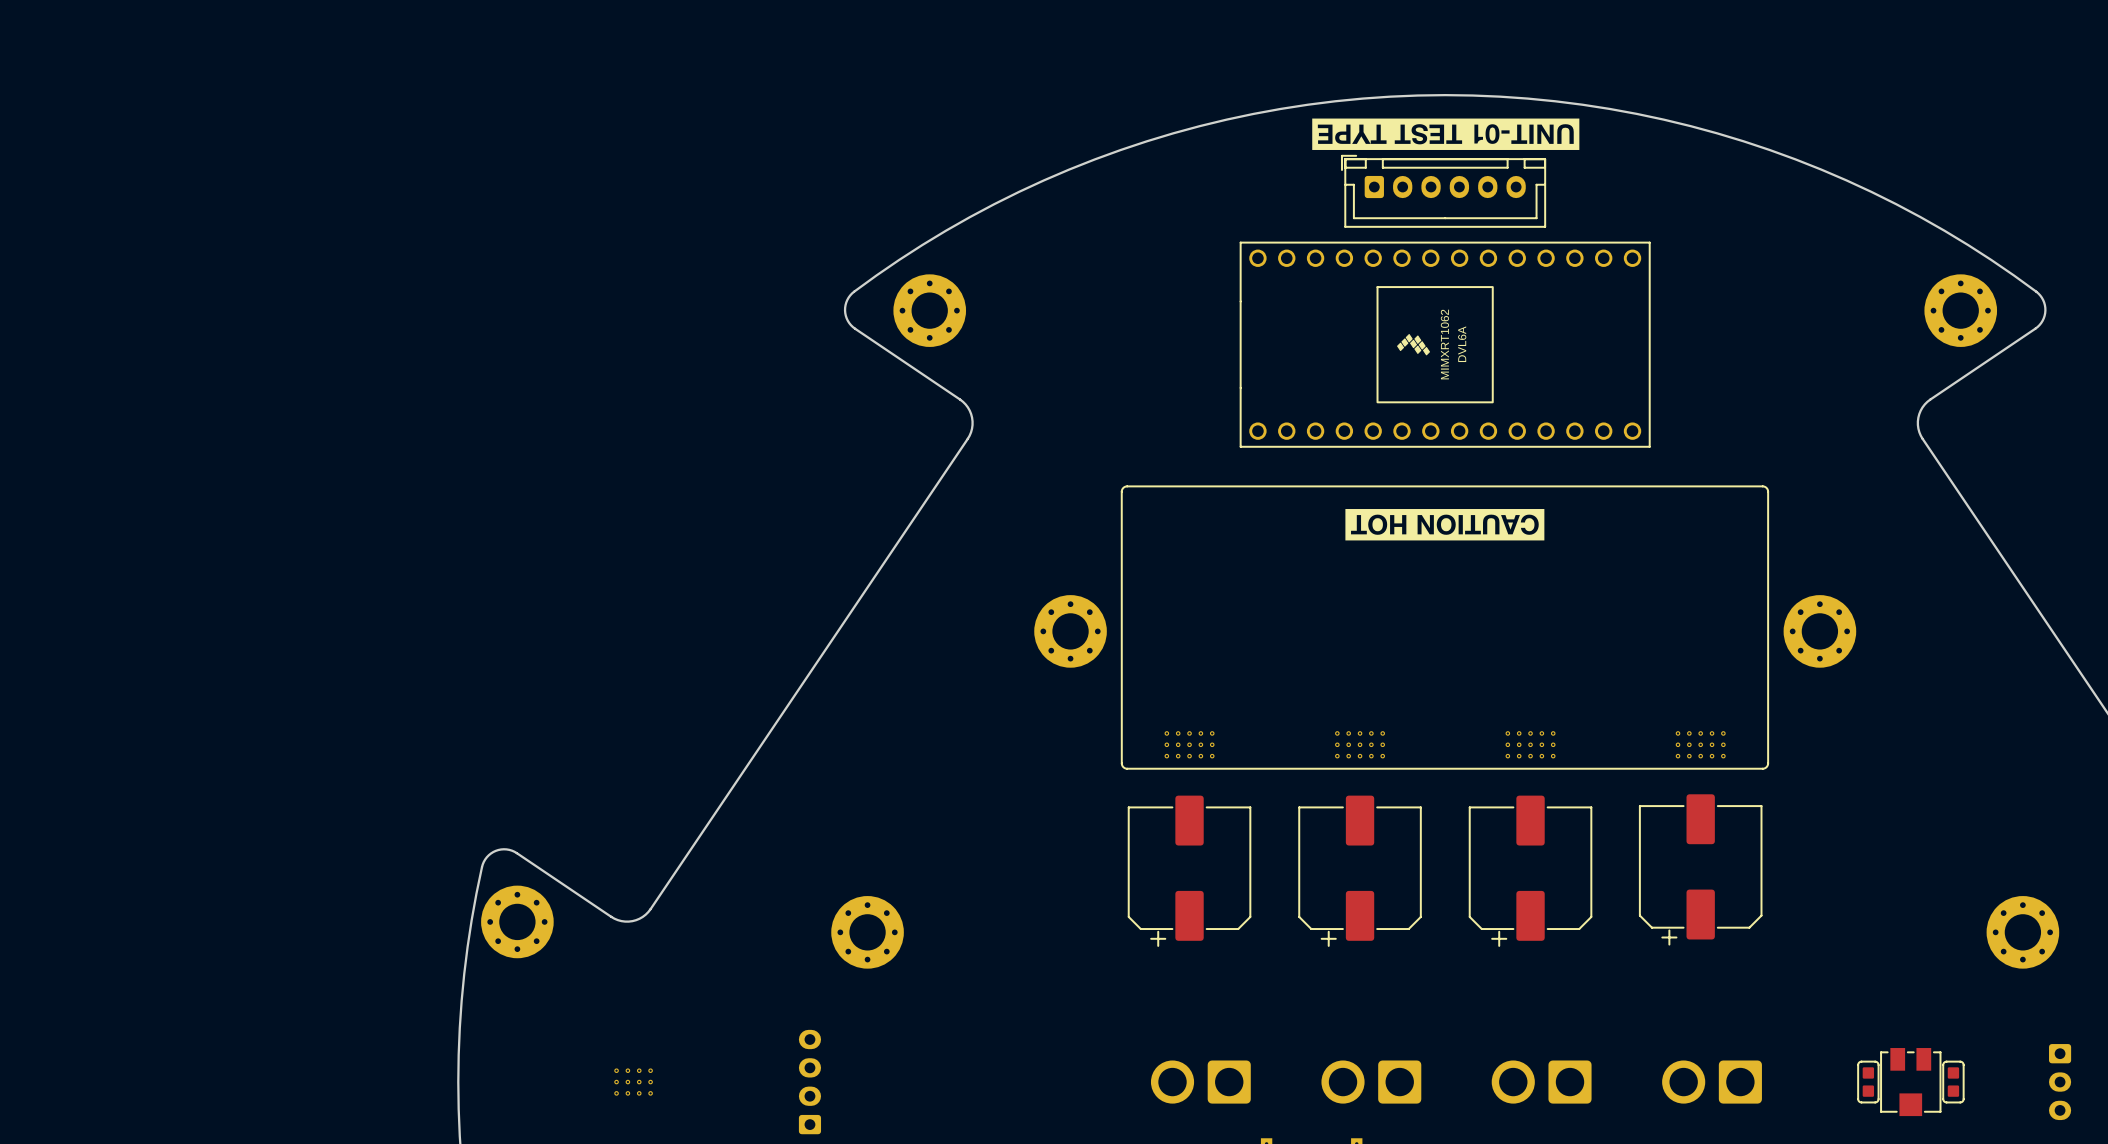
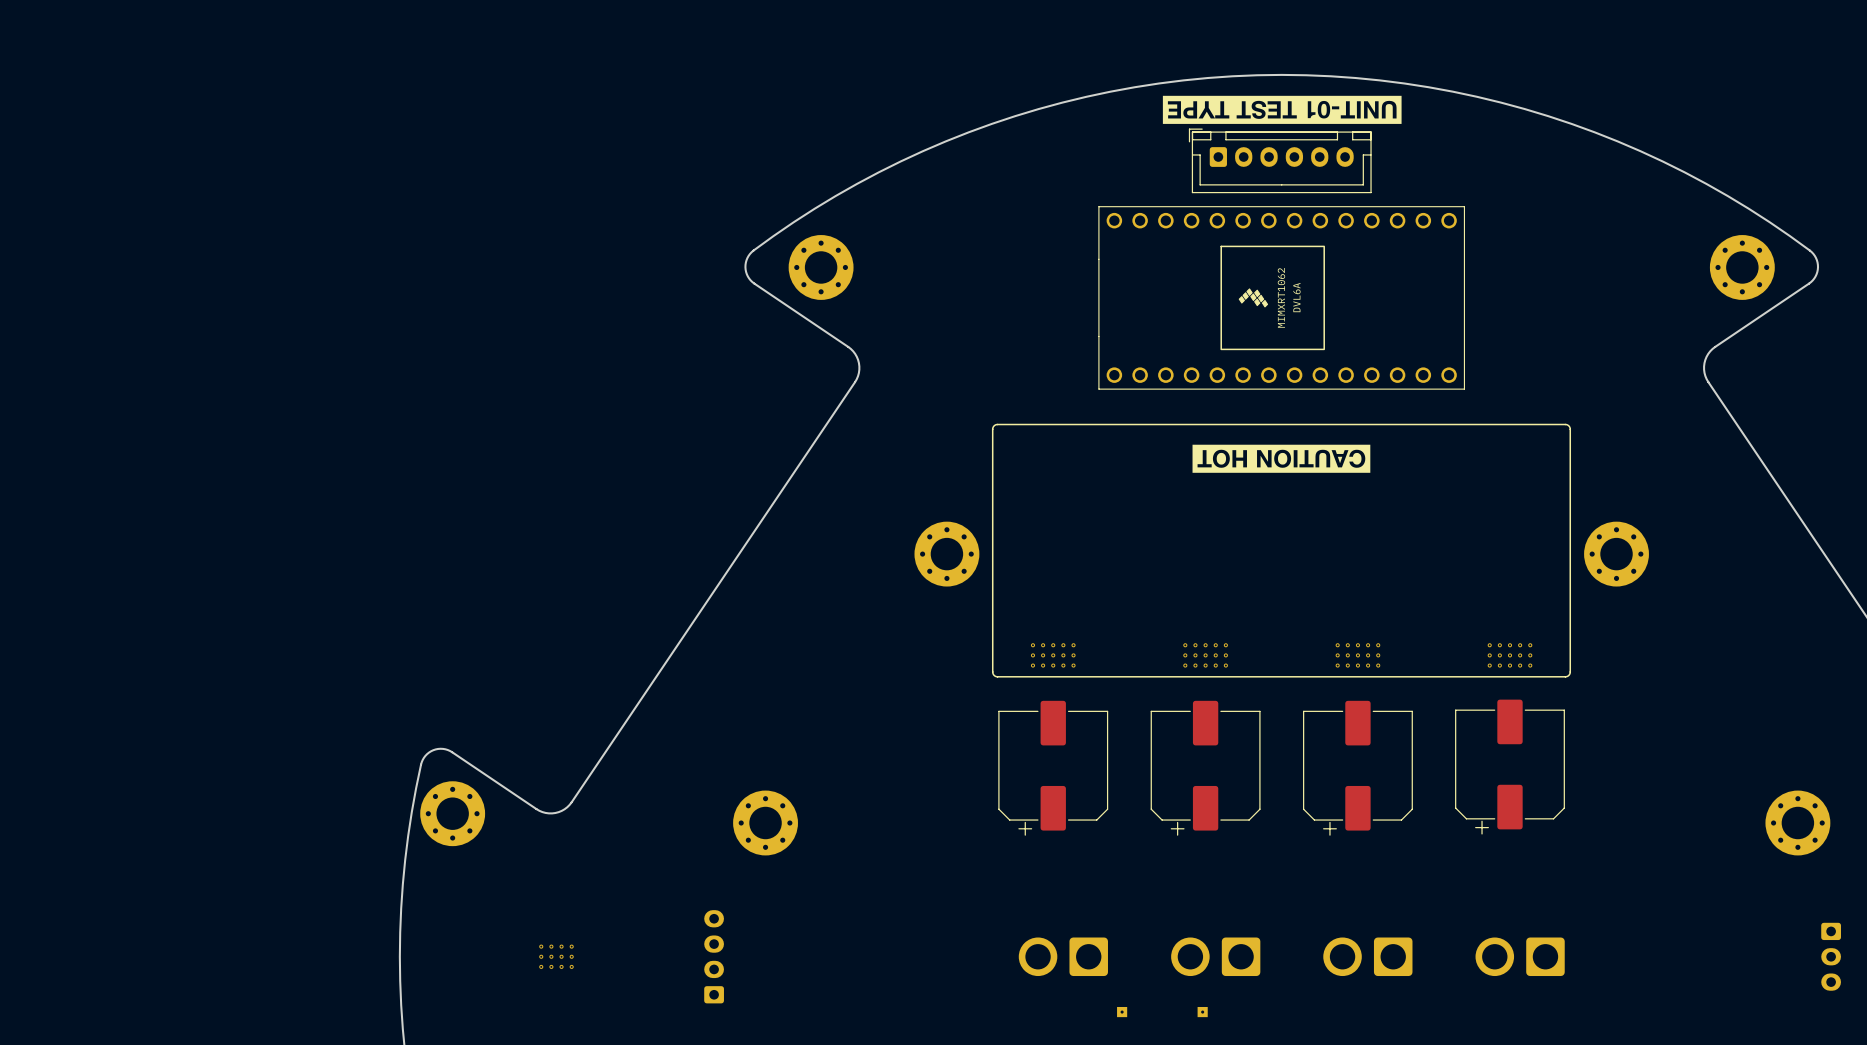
part: (1868, 1082) -> none
part: (1910, 1082) -> none
part: (1953, 1082) -> none

